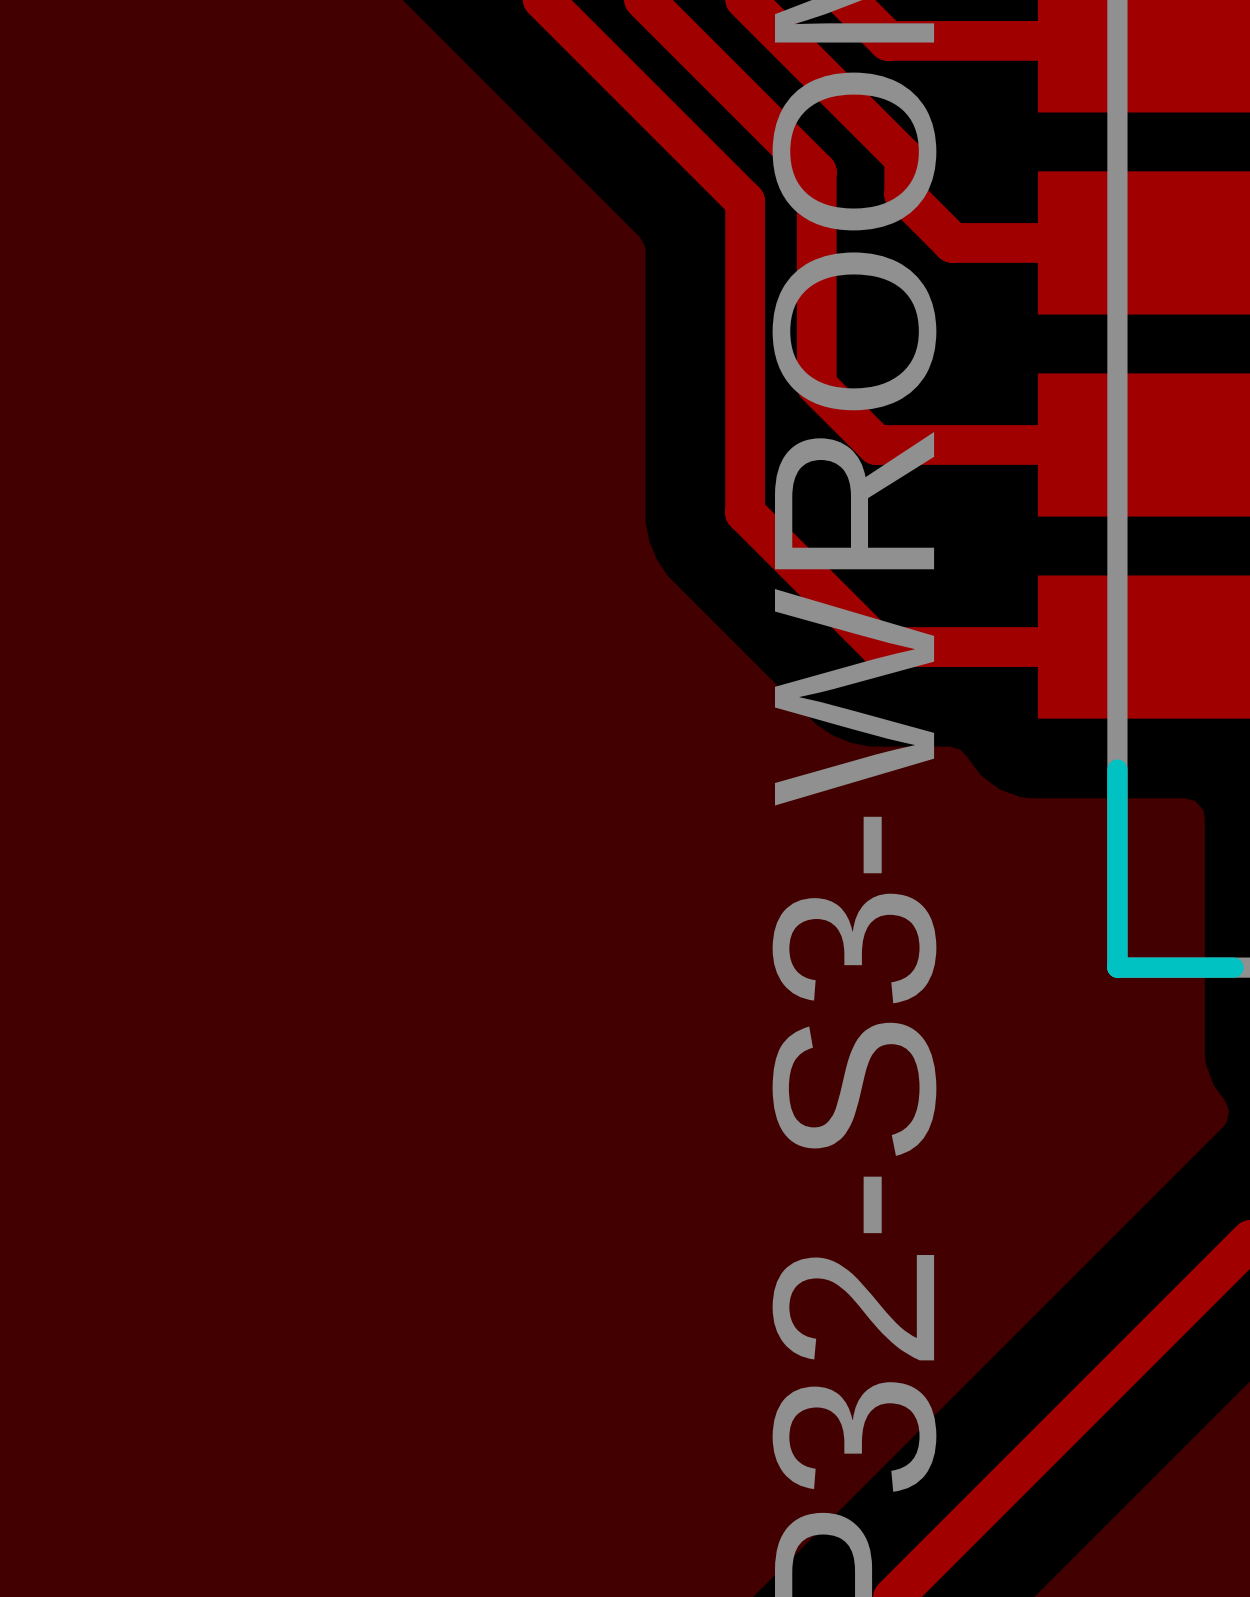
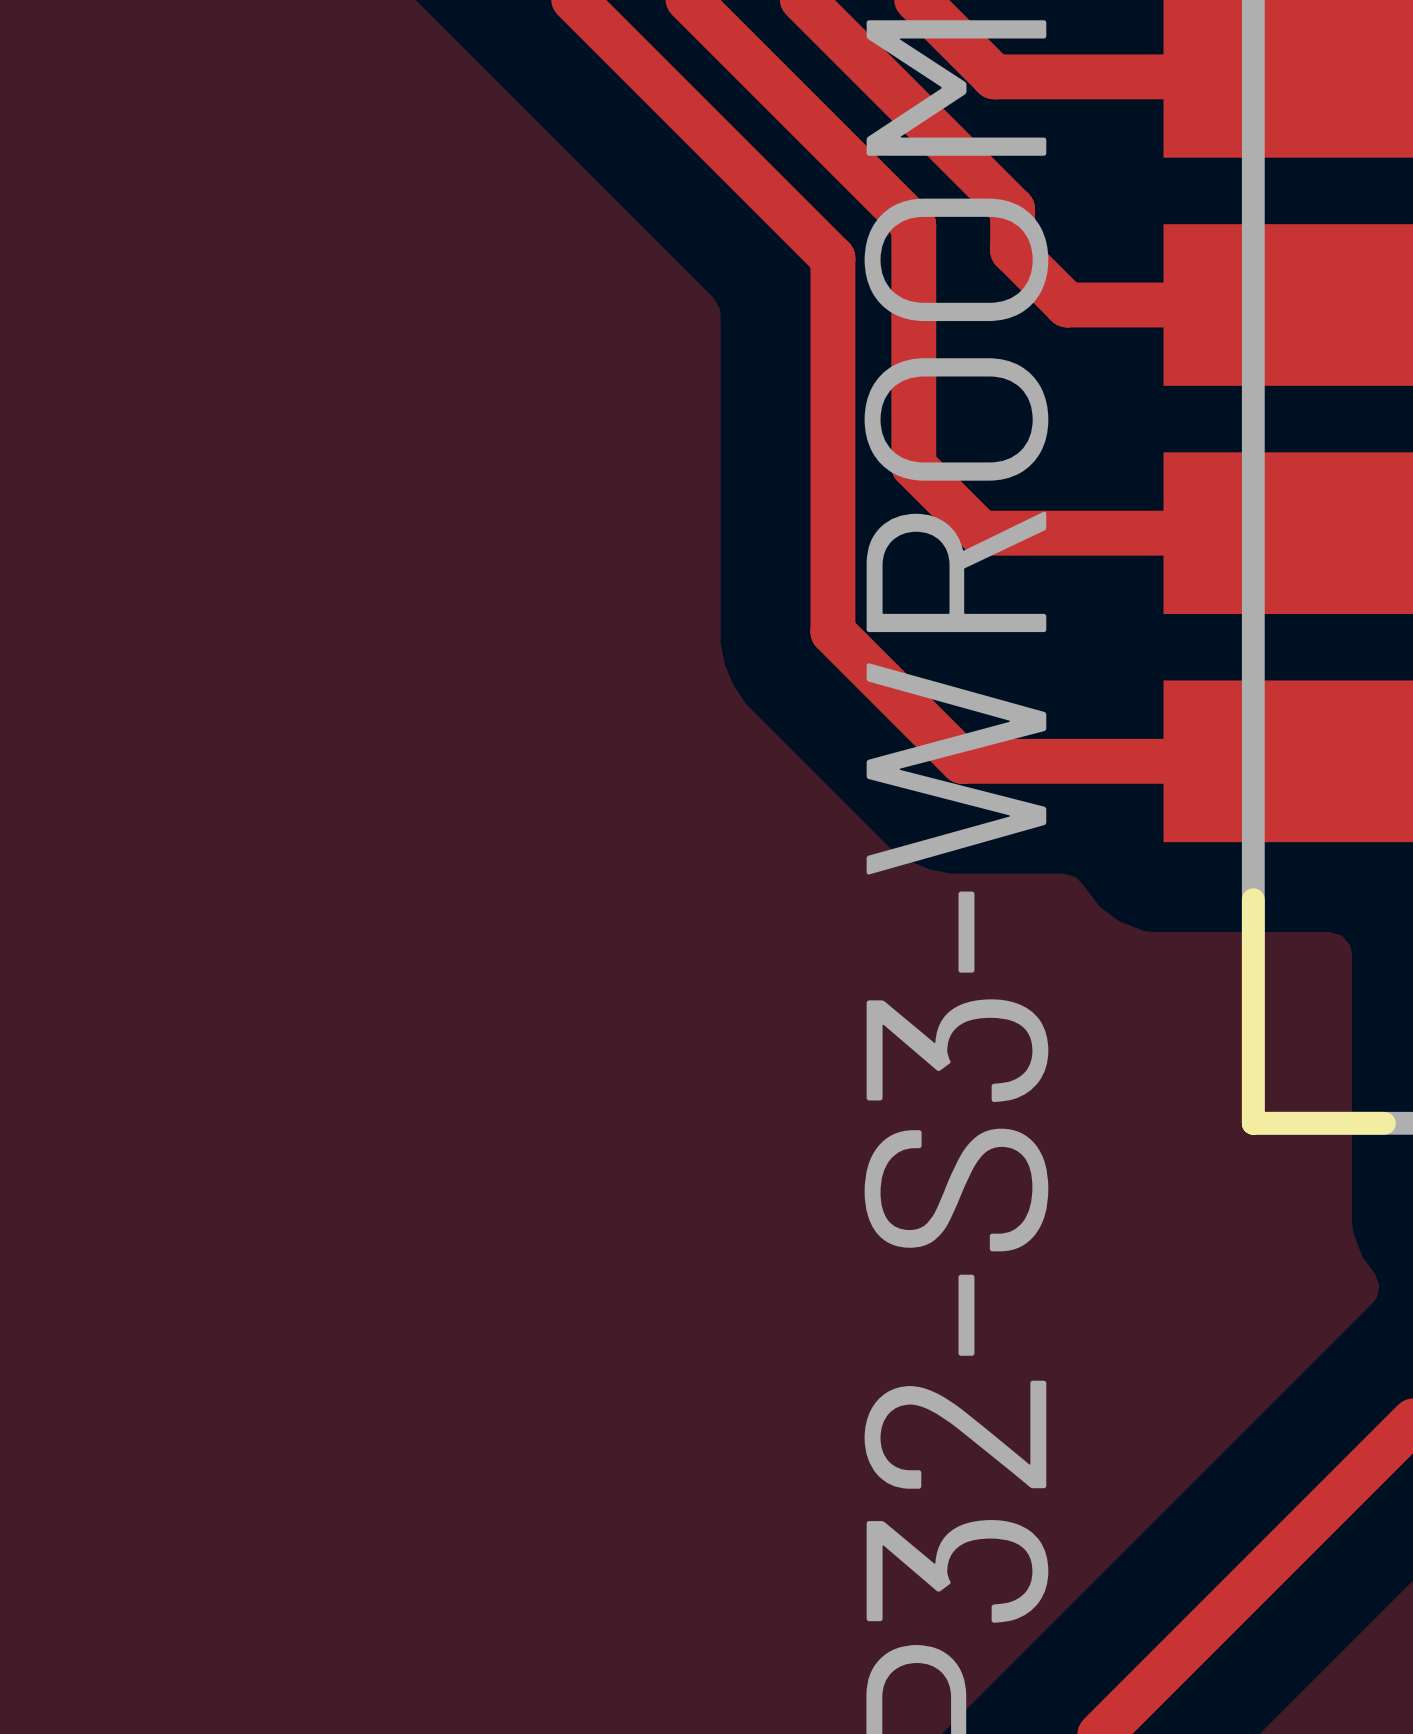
track: (745, 512) (879, 647) -> (832, 609) (832, 631) (962, 761) (984, 761)

